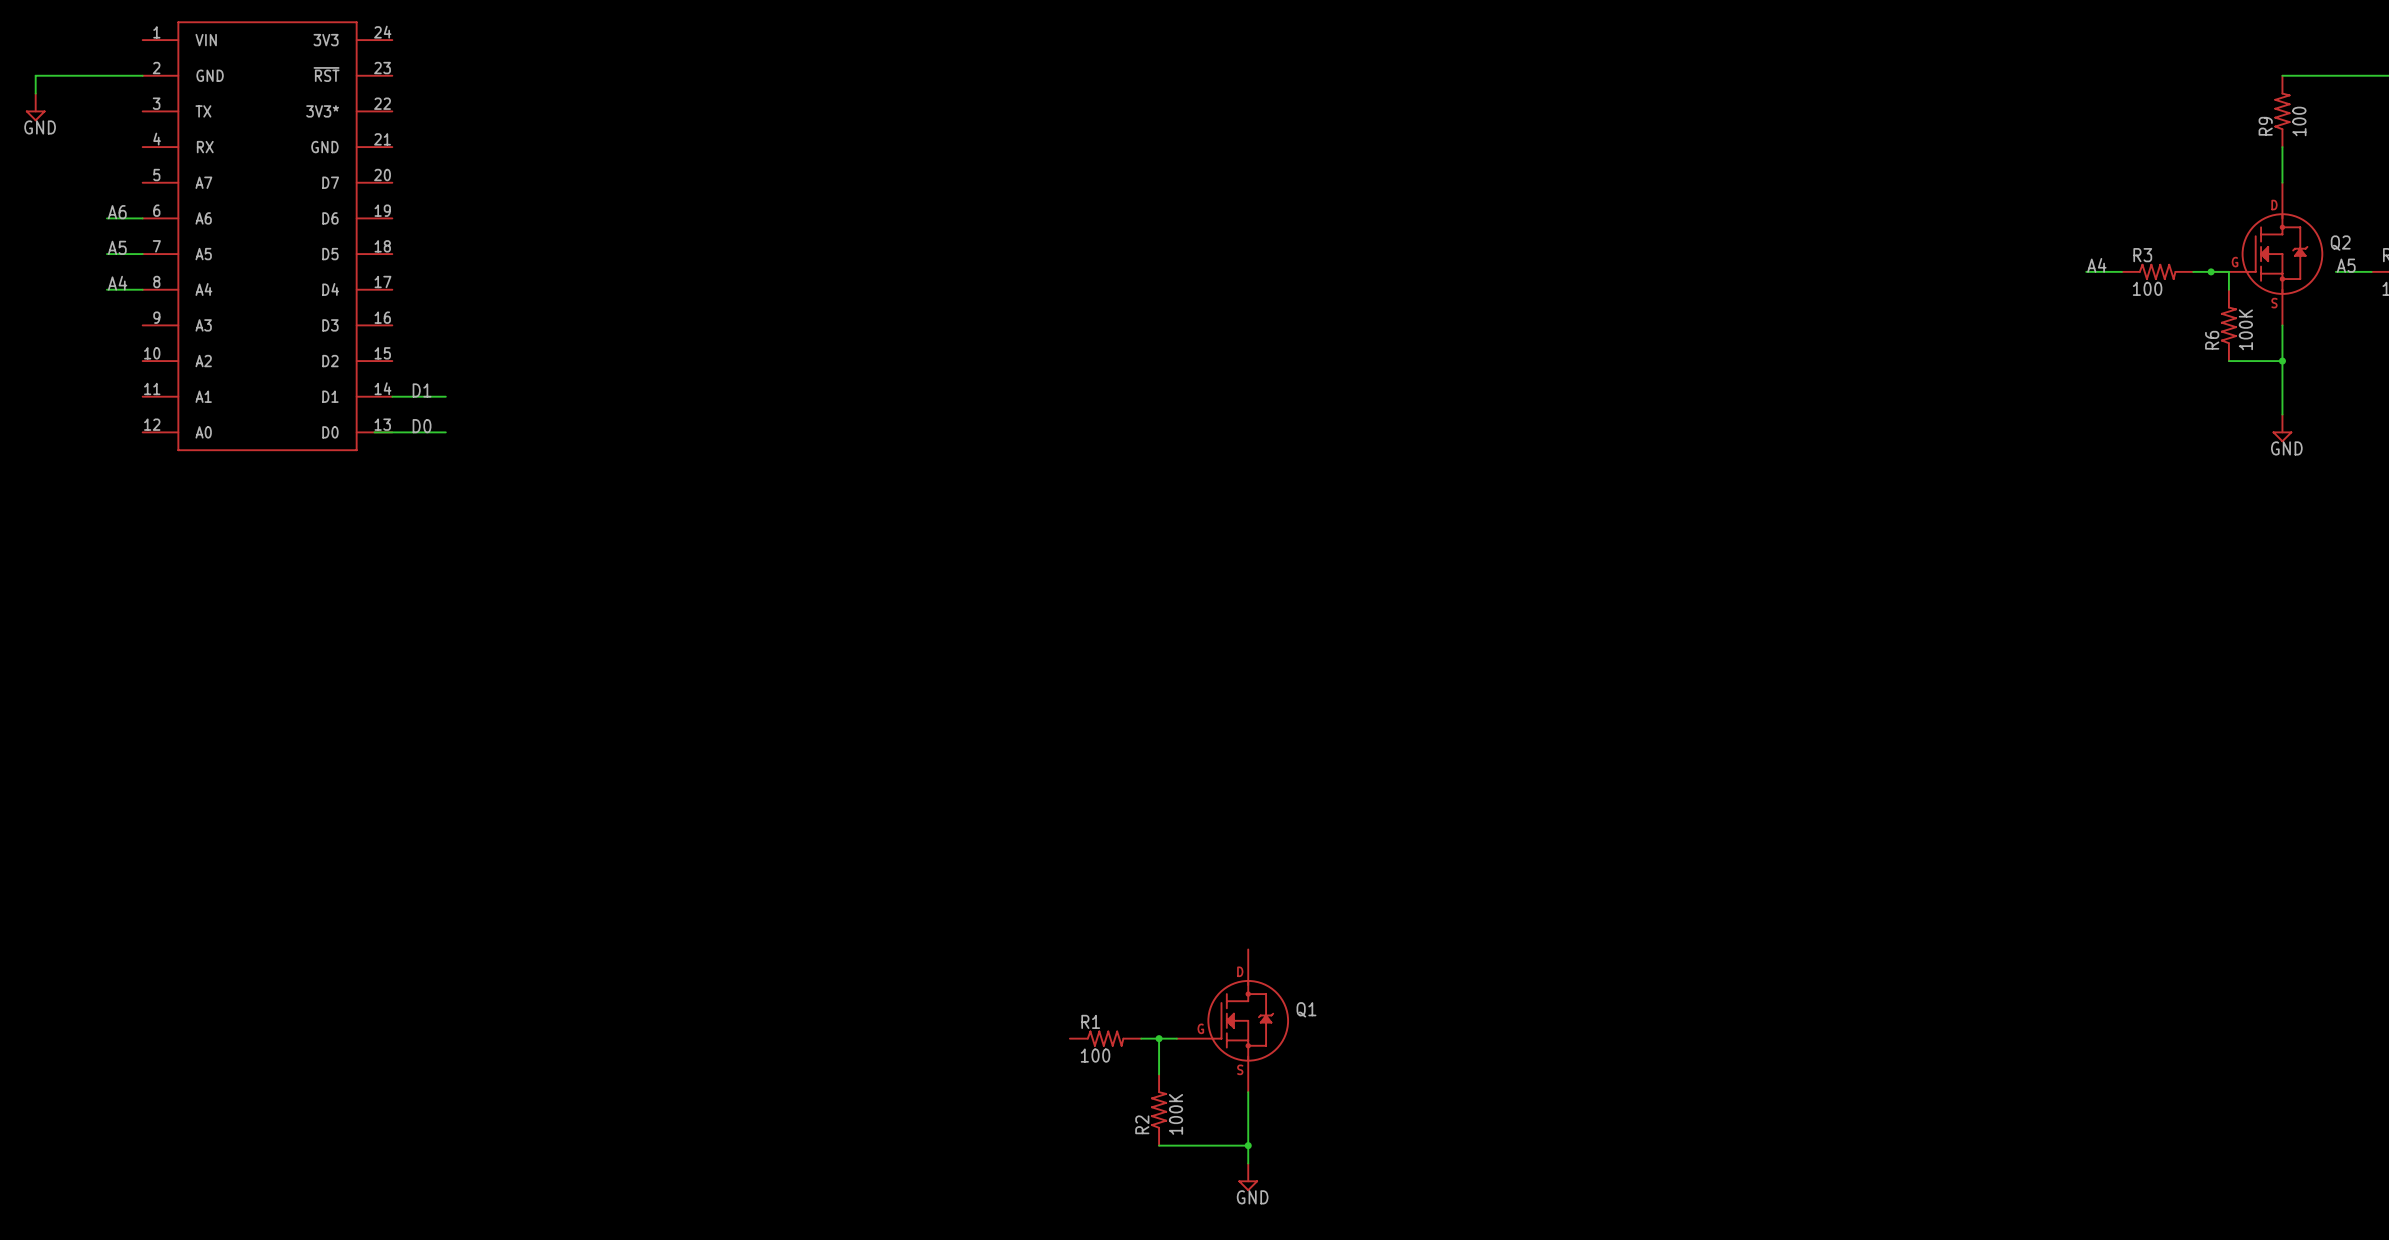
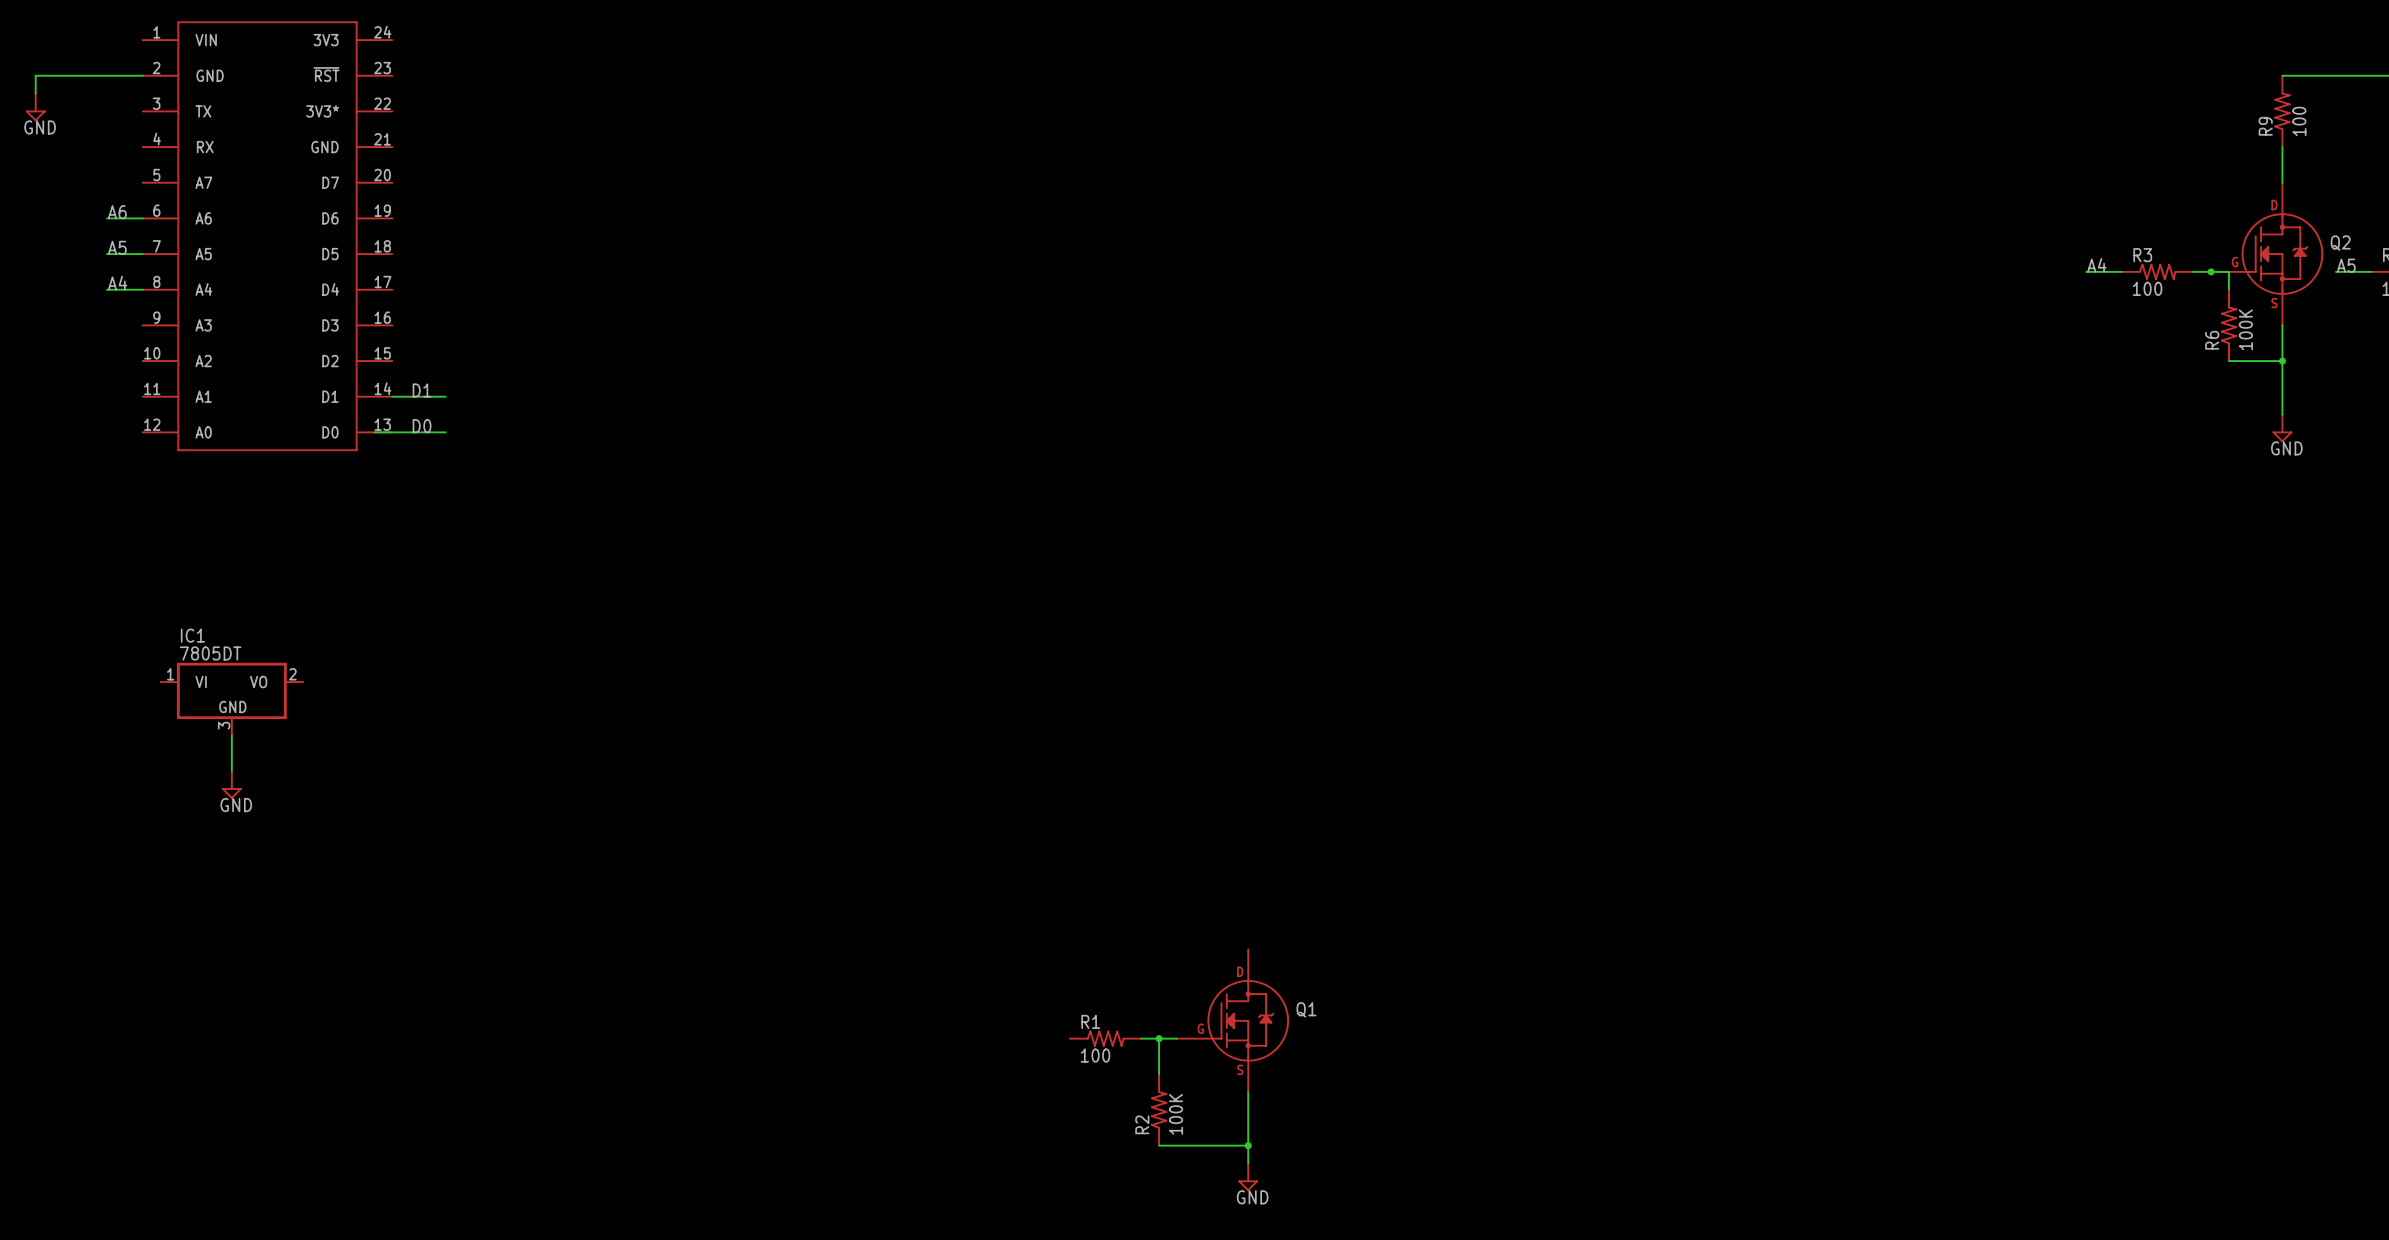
IC1: none -> 7805DT (231, 699)
wire: none -> (231, 735) (231, 771)
power symbol: none -> GND (231, 784)

